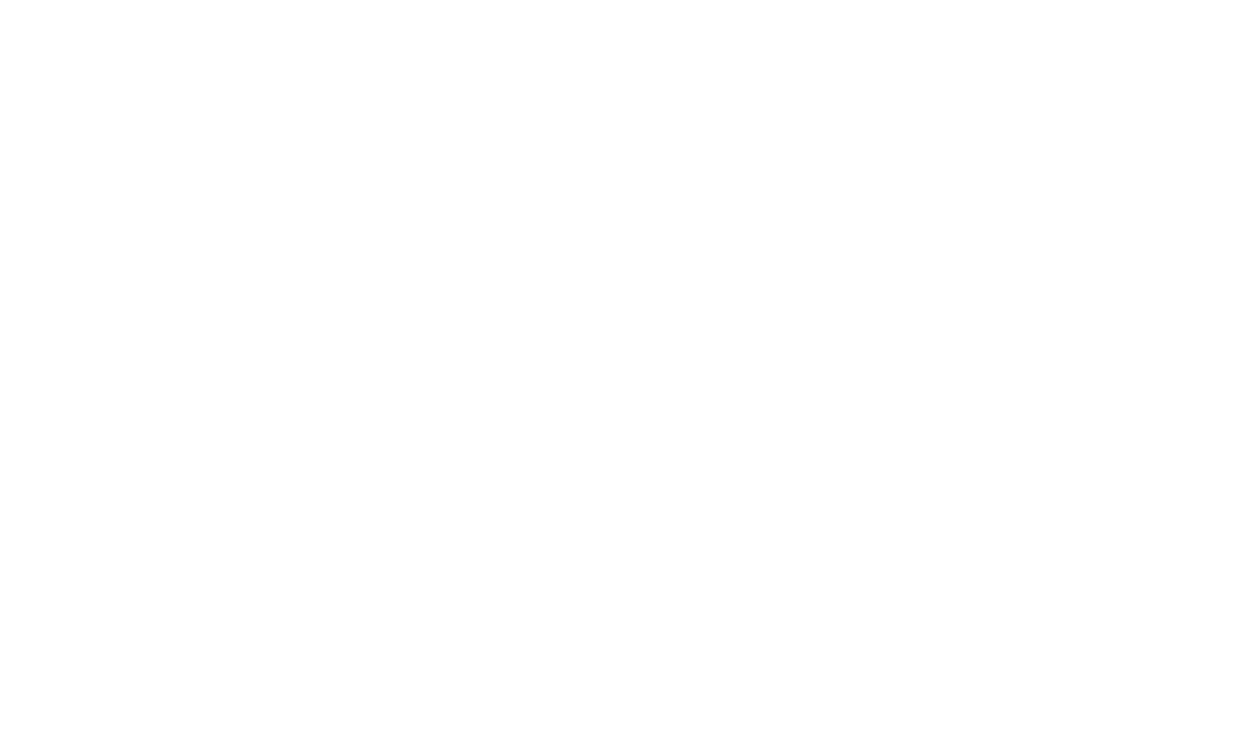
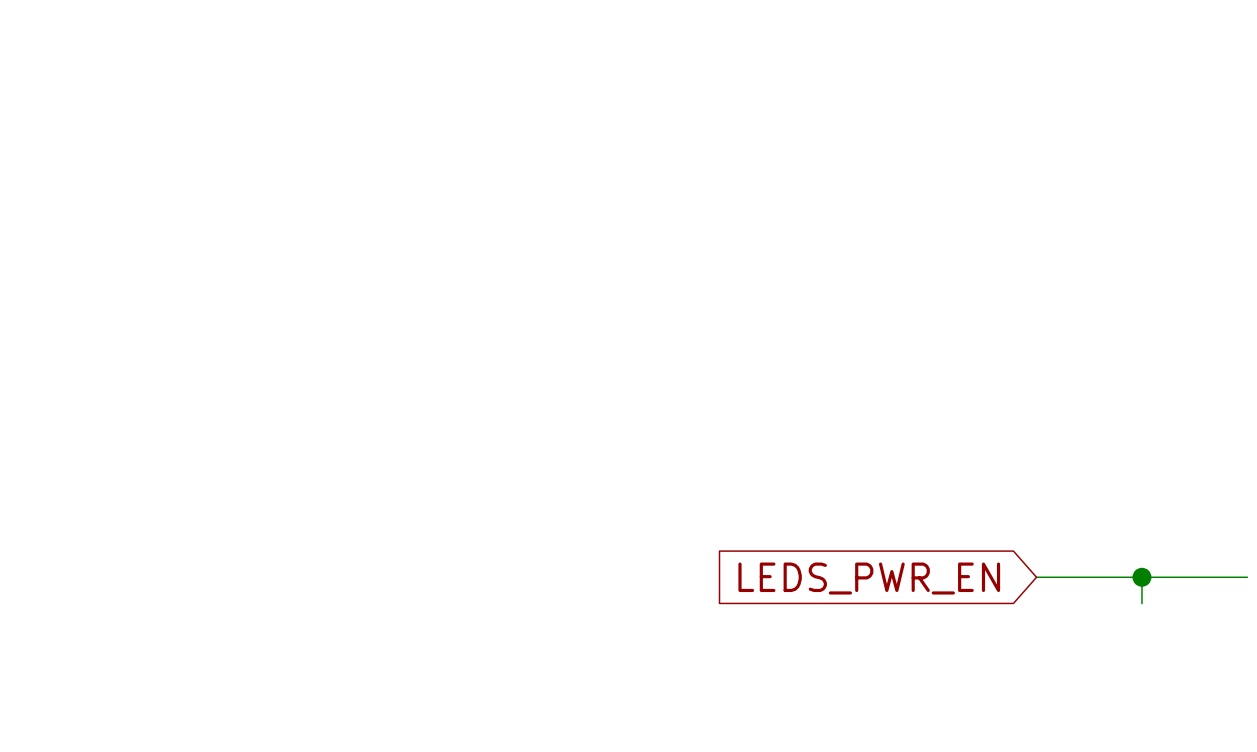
wire: none -> (1036, 577) (1247, 577)
wire: none -> (1141, 577) (1141, 603)
junction: none -> (1141, 577)
global label: none -> LEDS_PWR_EN (869, 578)

